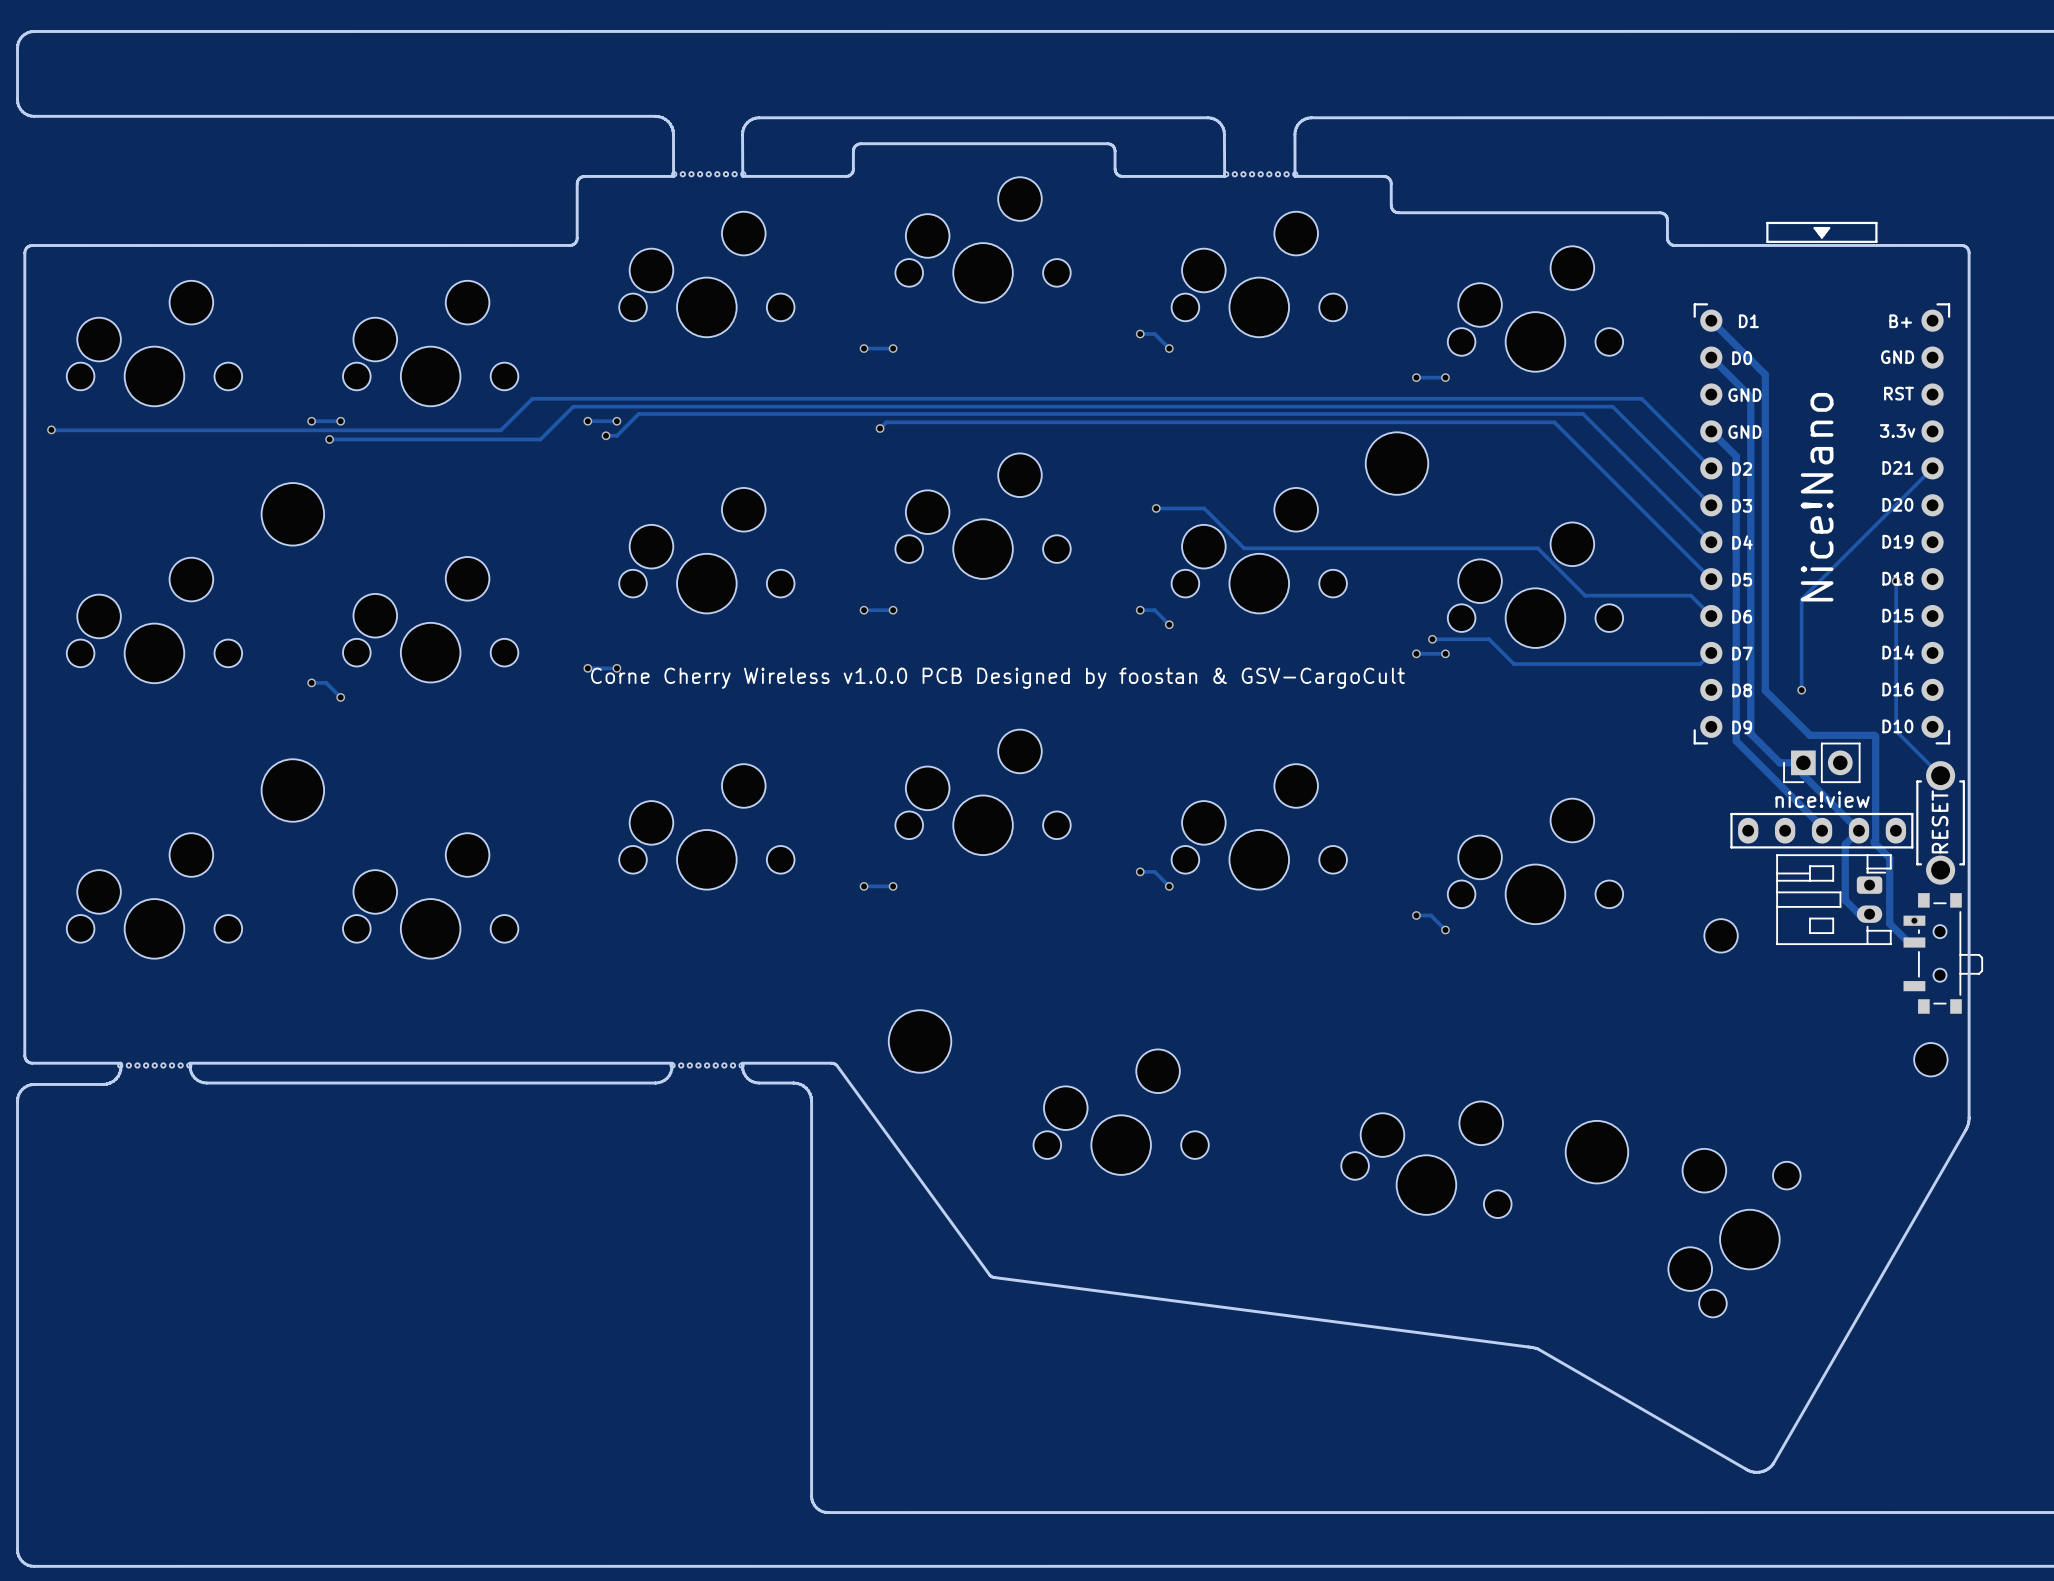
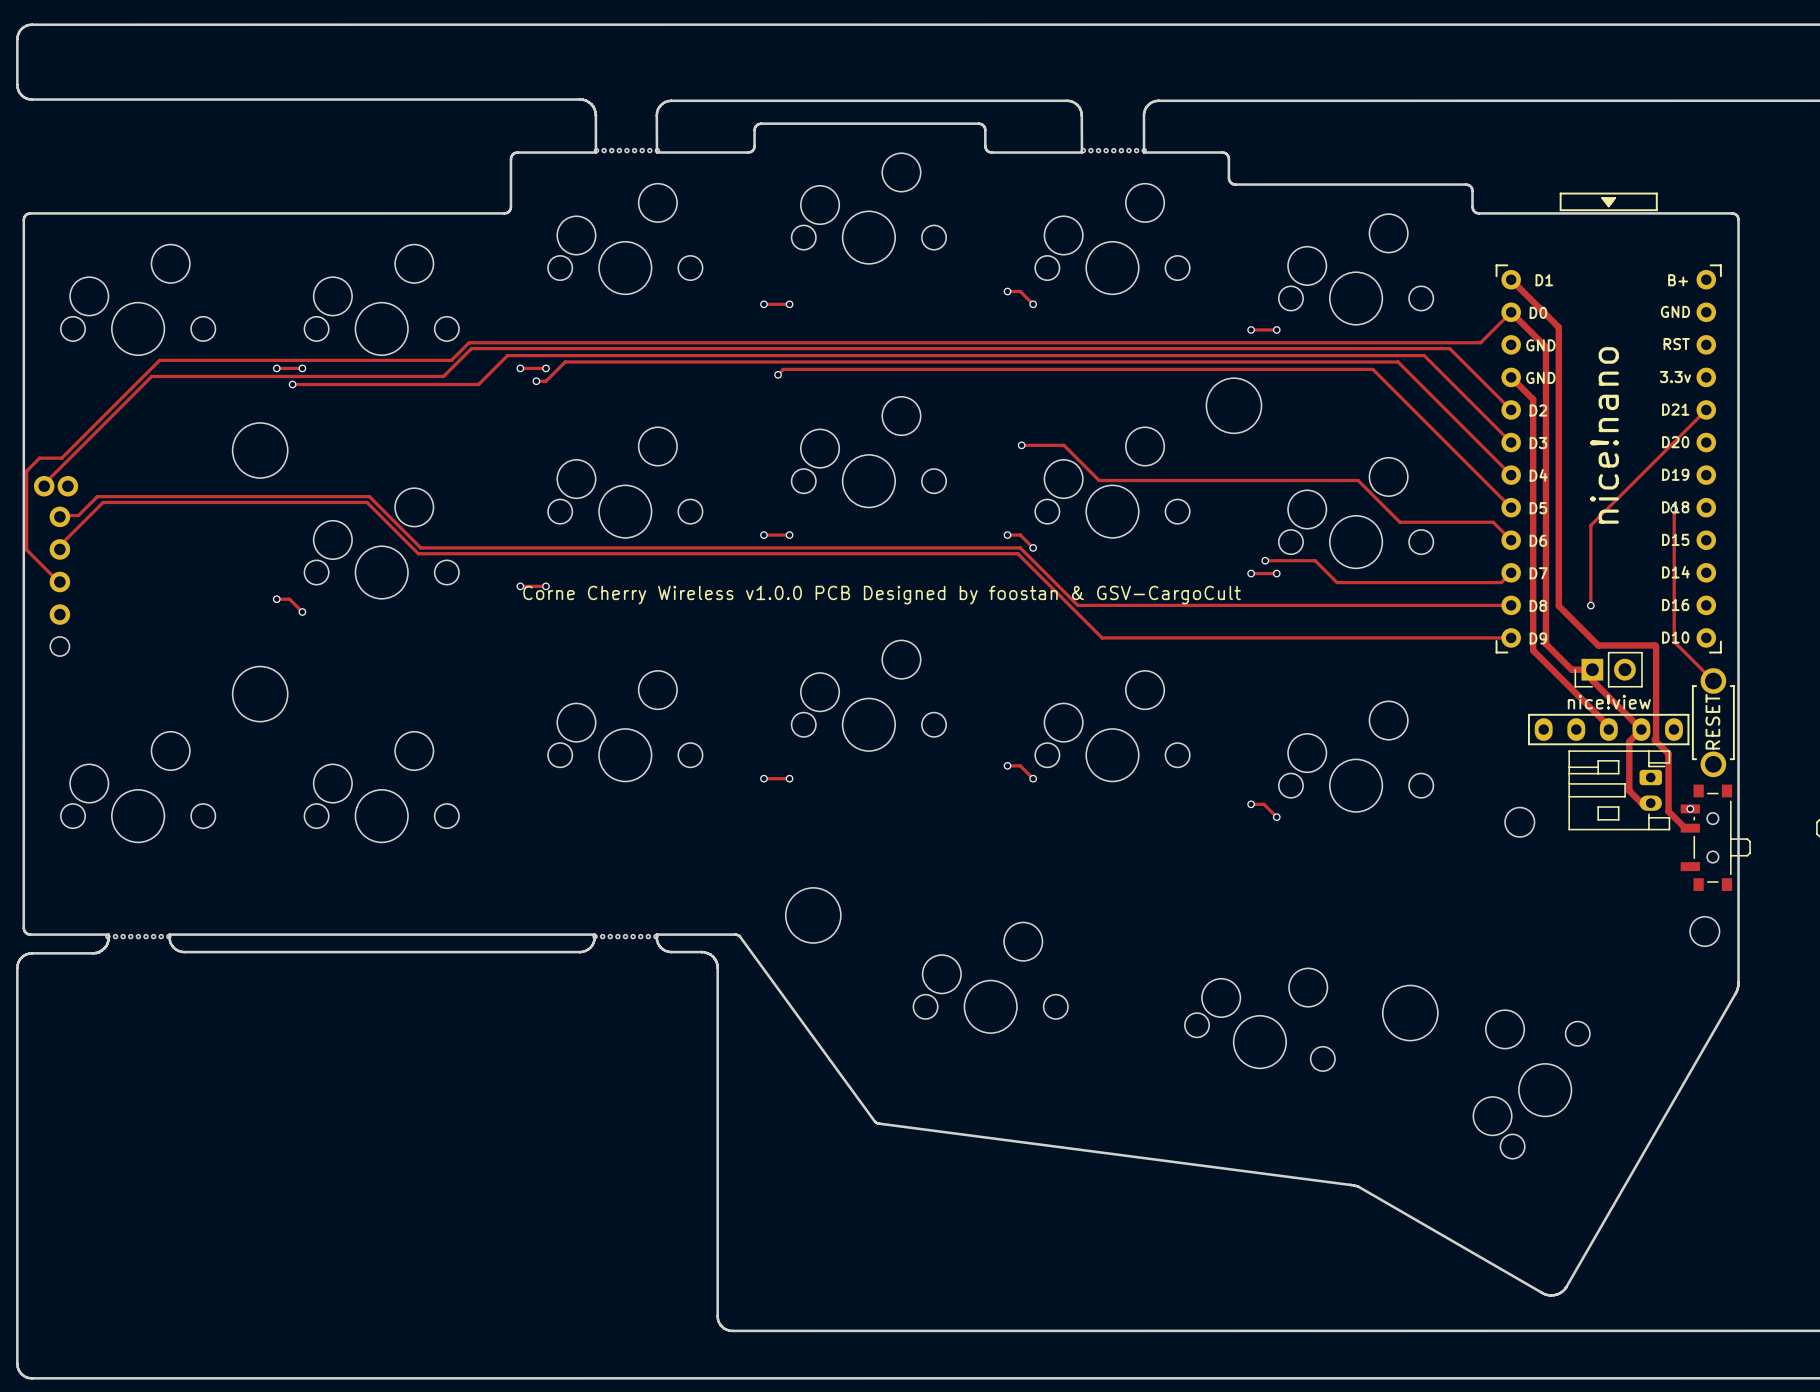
track: none -> (1511, 312) (1480, 342) (469, 342) (451, 360) (159, 360) (61, 458) (39, 458) (26, 471) (26, 549) (57, 580)
track: (51, 429) (169, 430) -> (43, 484) (151, 376)
via: (51, 429) -> none
part value: Nice!Nano (1817, 497) -> nice!nano (1604, 435)
track: none -> (57, 515) (78, 515) (97, 496) (369, 496) (420, 547) (1020, 547) (1077, 605) (1511, 605)
part: (154, 620) -> none
track: none -> (57, 548) (103, 502) (367, 502) (418, 553) (1017, 553) (1102, 637) (1511, 637)
part: none -> (56, 566)

